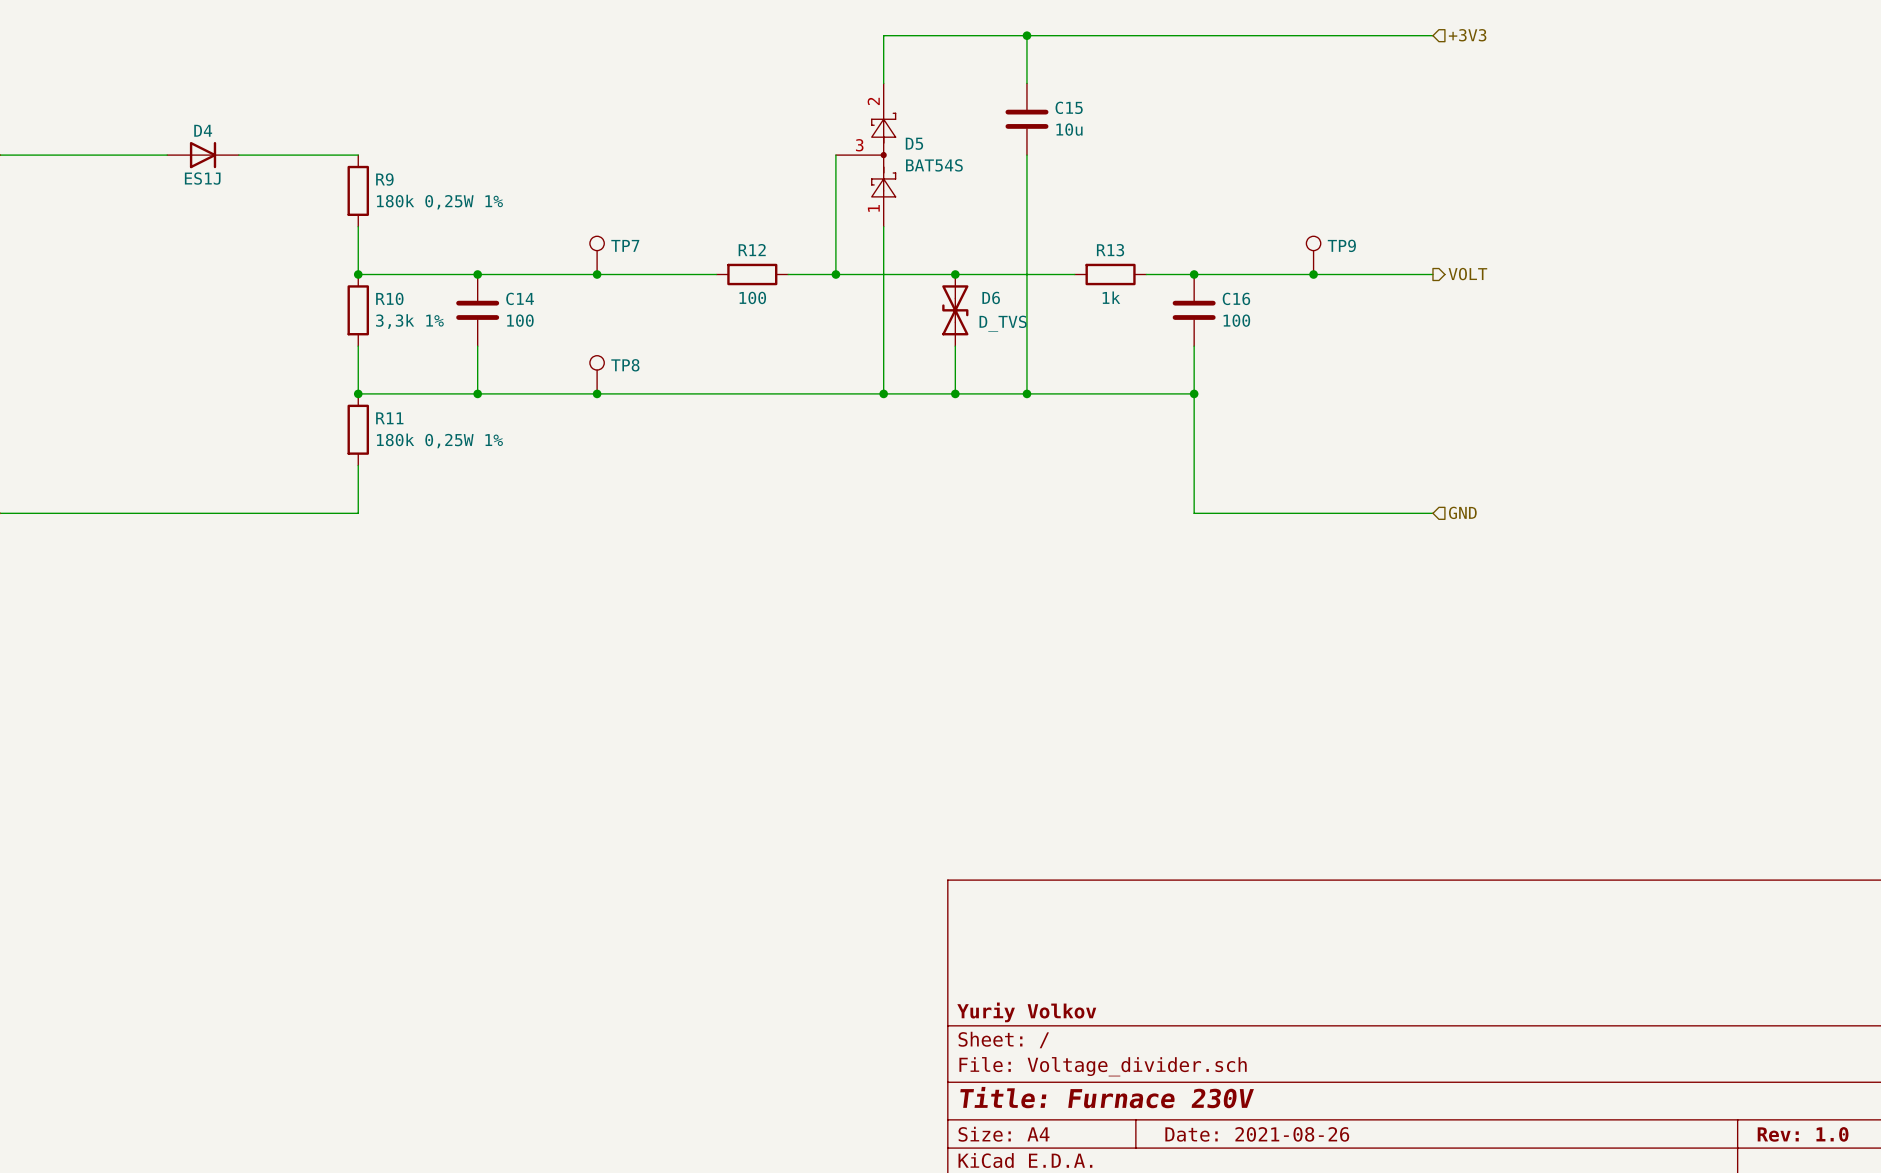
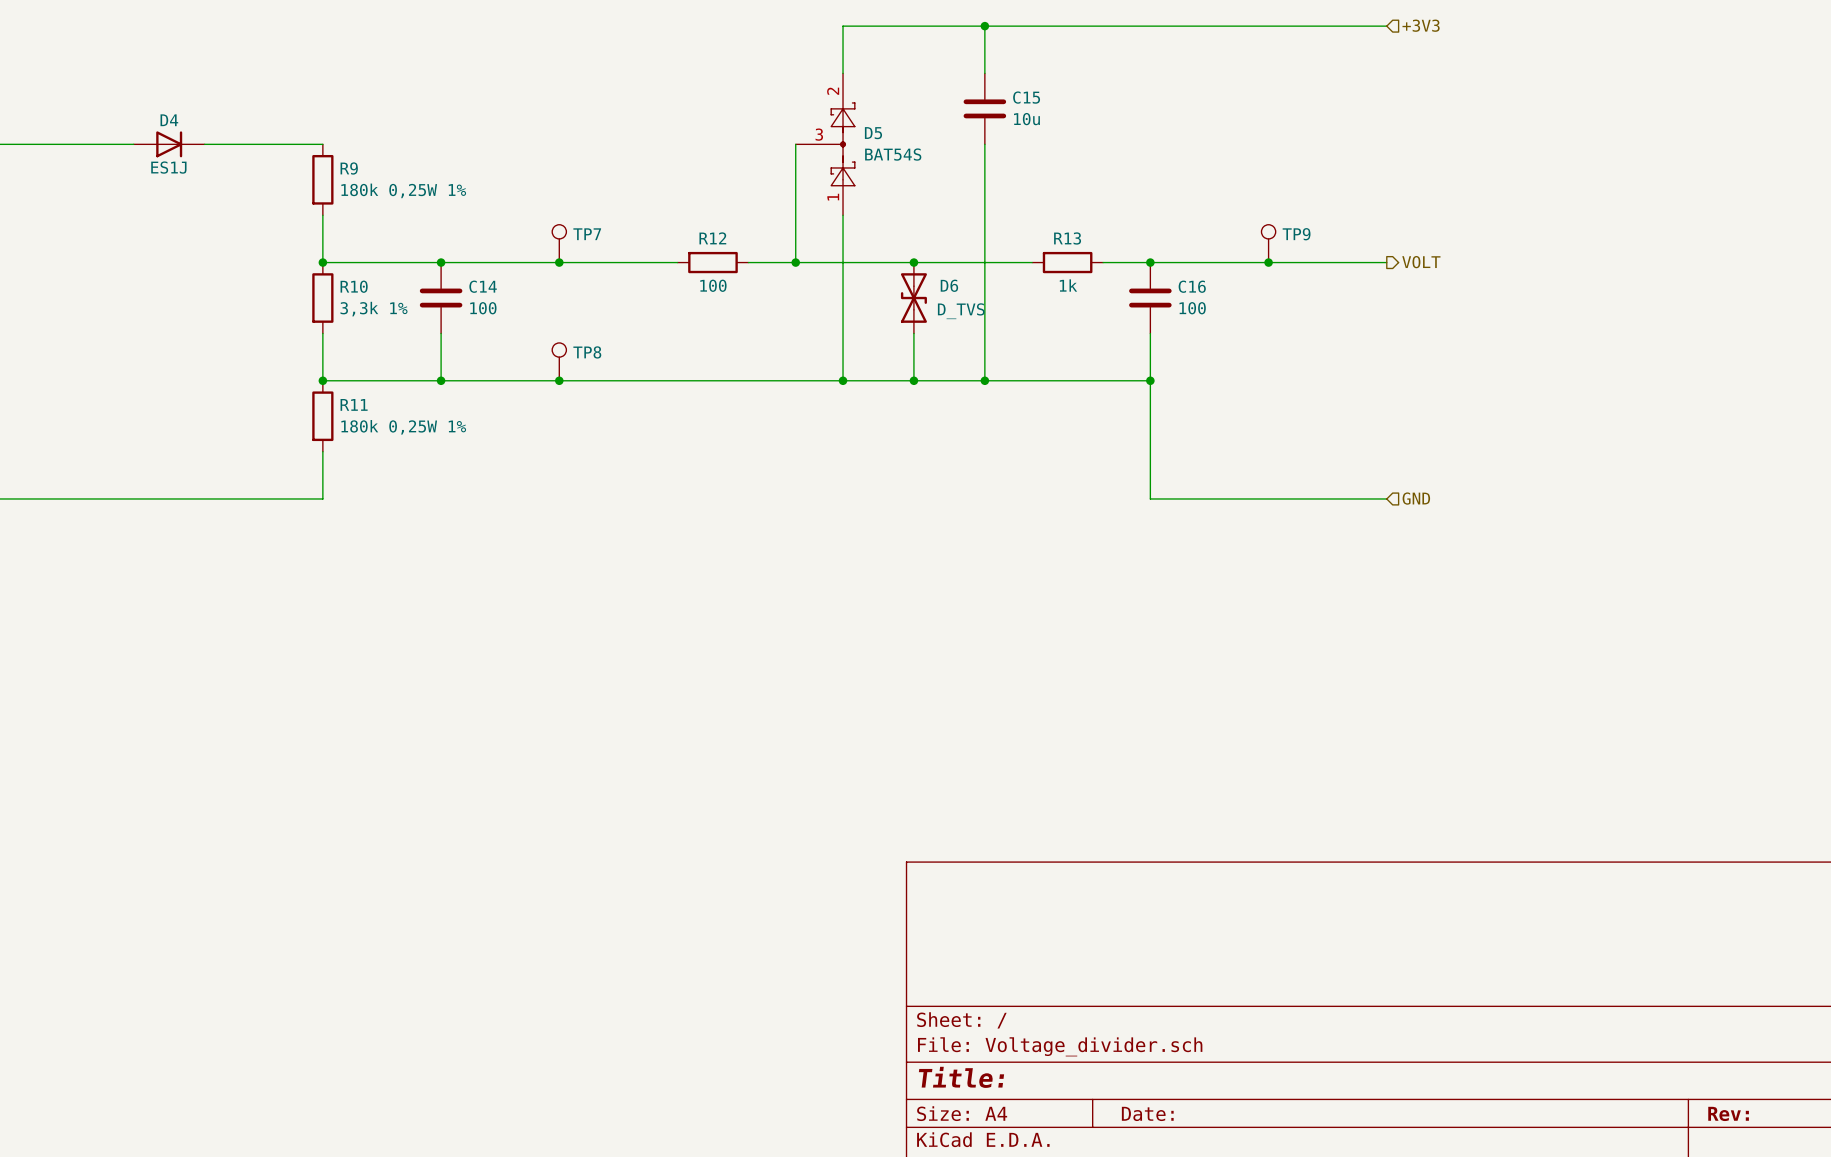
title block: Yuriy Volkov (1026, 1012) -> none
title block: Title: Furnace 230V (1107, 1097) -> Title: (961, 1077)
title block: Date: 2021-08-26 (1257, 1134) -> Date: (1147, 1113)
title block: Rev: 1.0 (1803, 1134) -> Rev: (1728, 1113)

